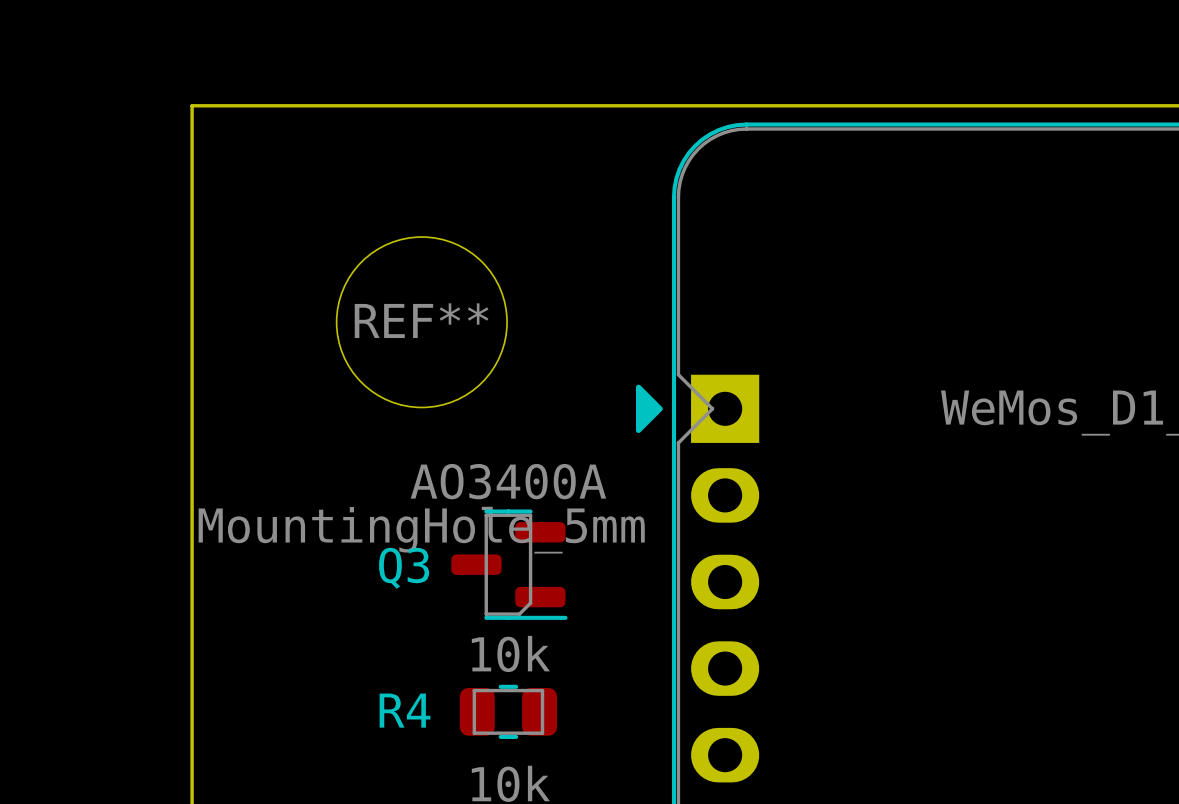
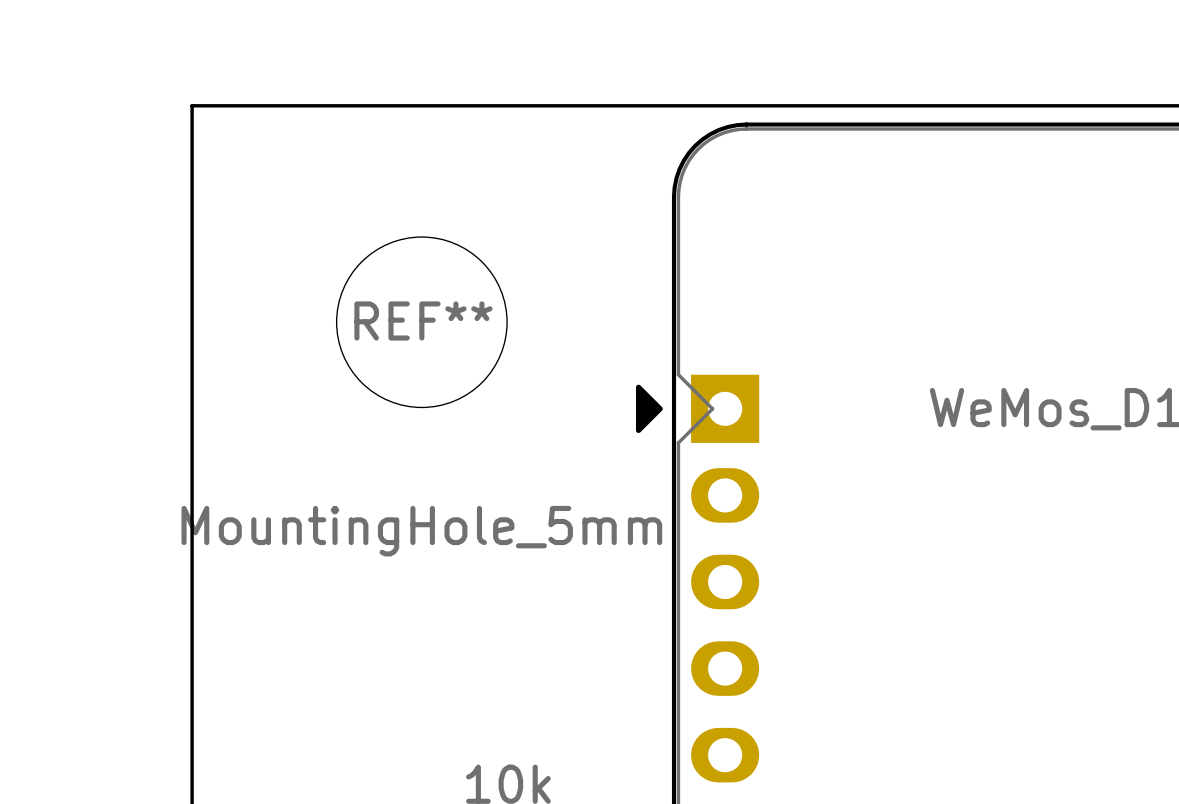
Q3: AO3400A (509, 564) -> none
R4: 10k (508, 711) -> none

